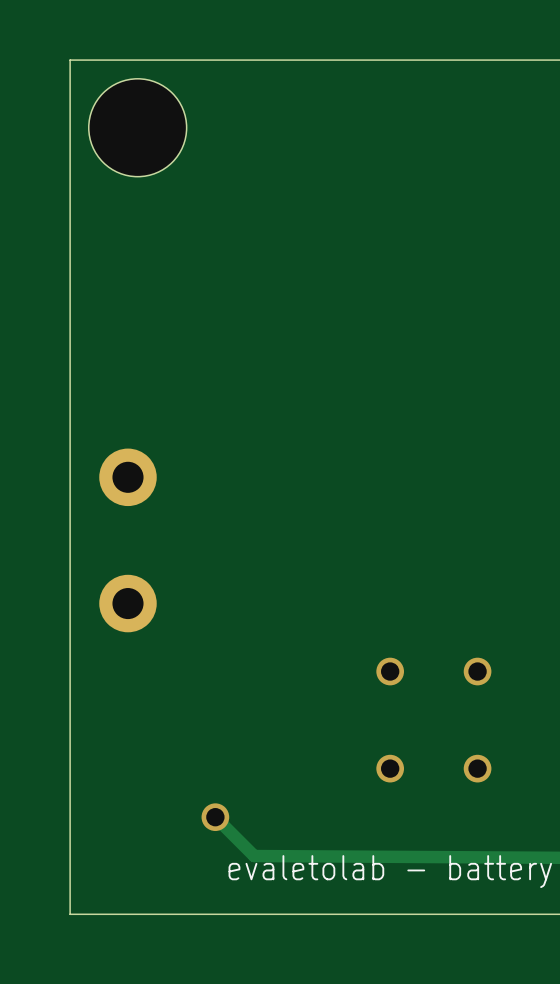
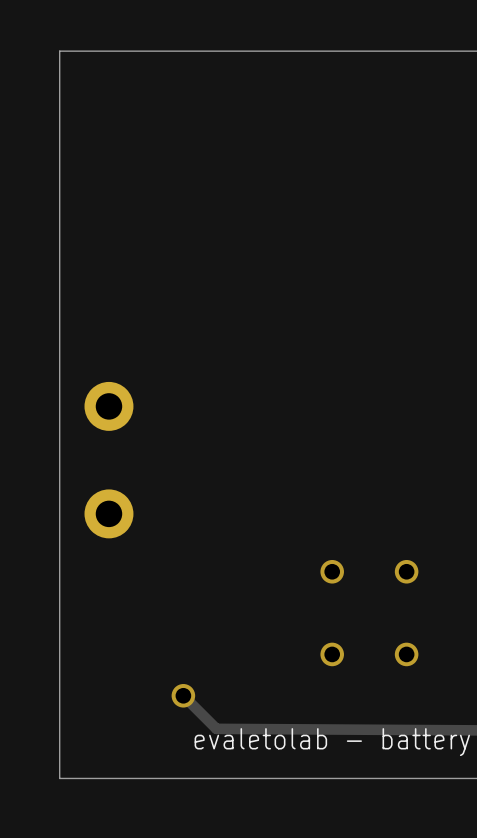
hole: (137, 127) -> none

